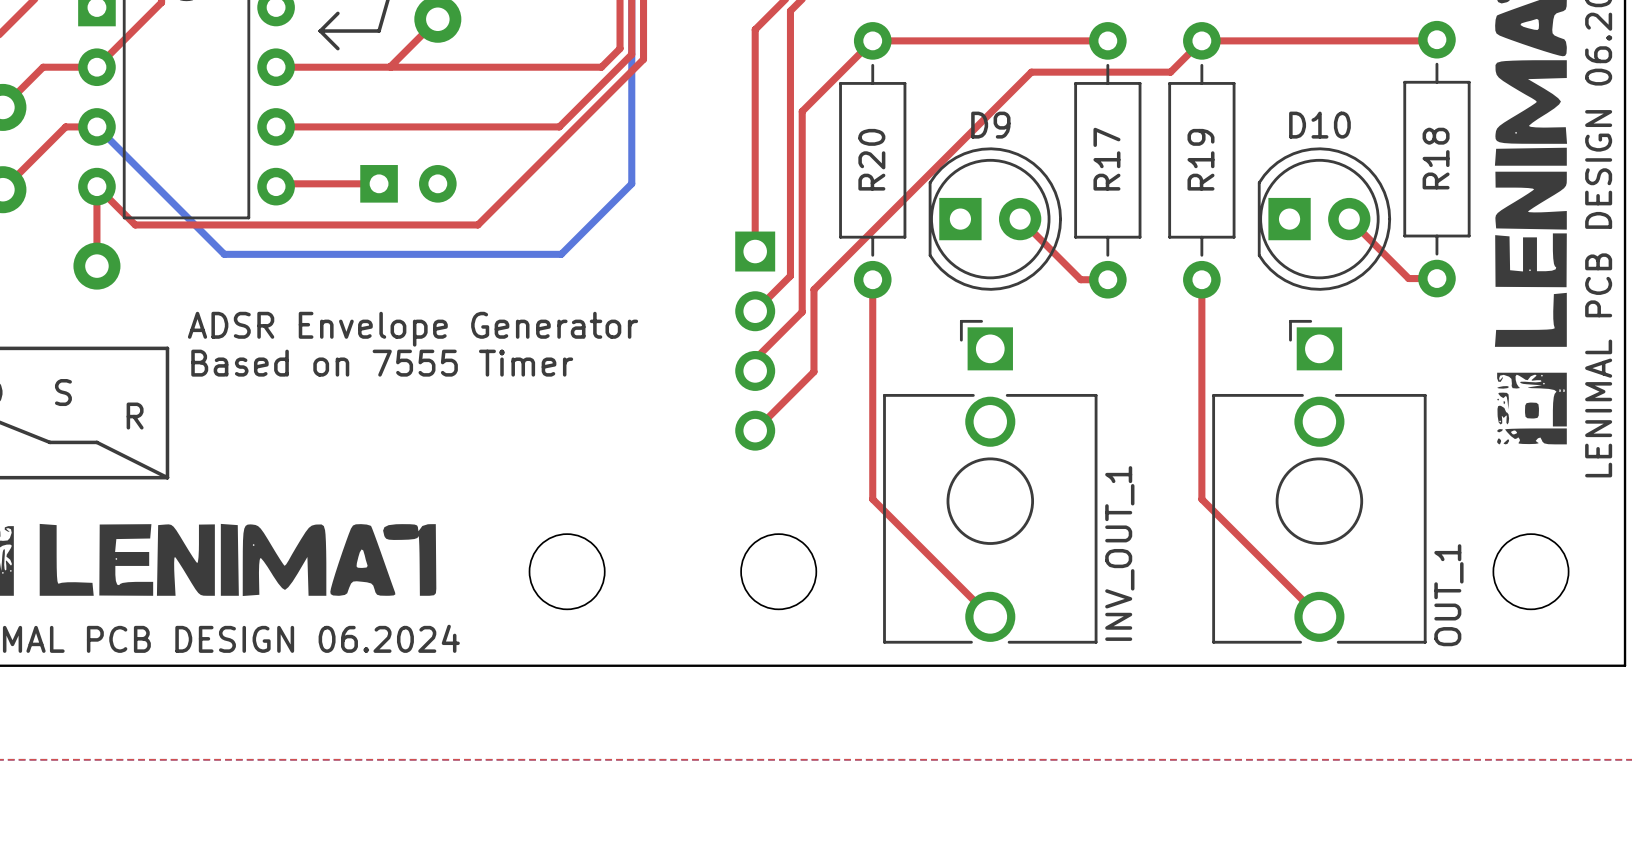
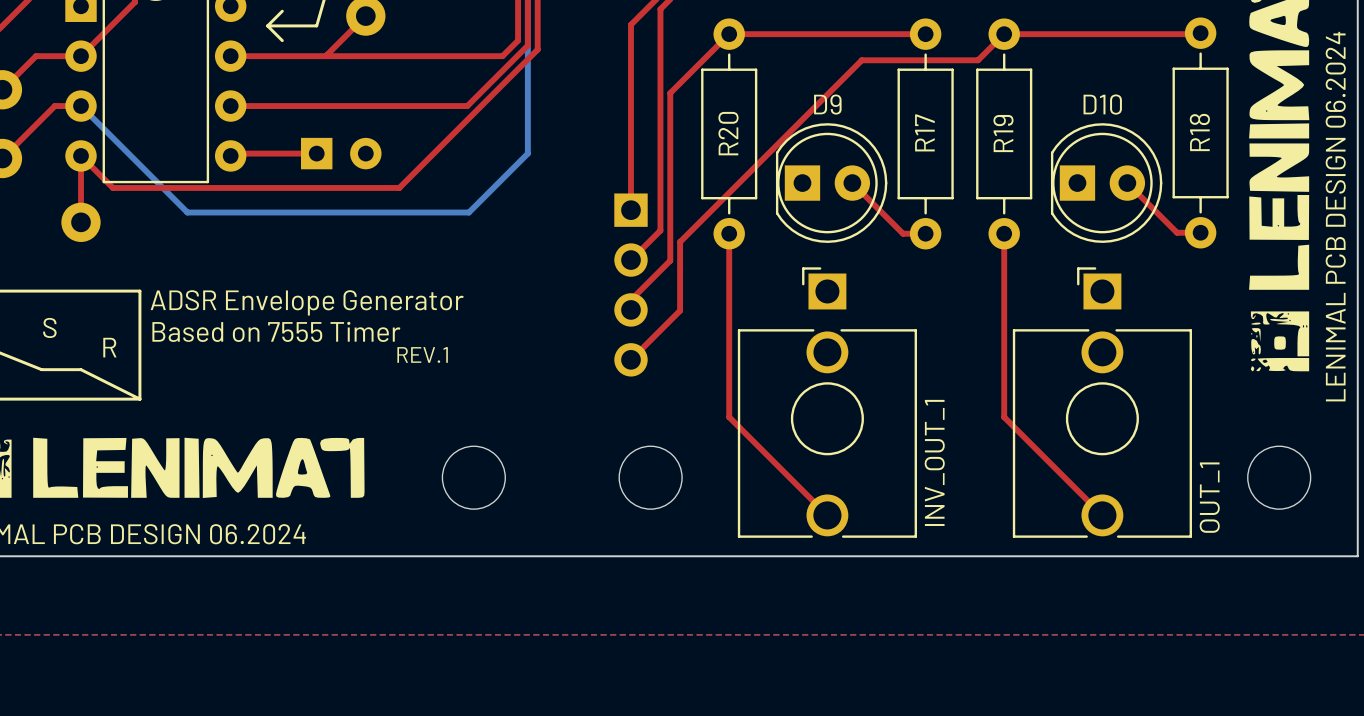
text: ADSR Envelope Generator (413, 329) -> none
text: Based on 7555 Timer (382, 363) -> ADSR Envelope Generator (307, 302)
text: none -> Based on 7555 Timer (276, 331)
text: none -> REV.1 (422, 354)

